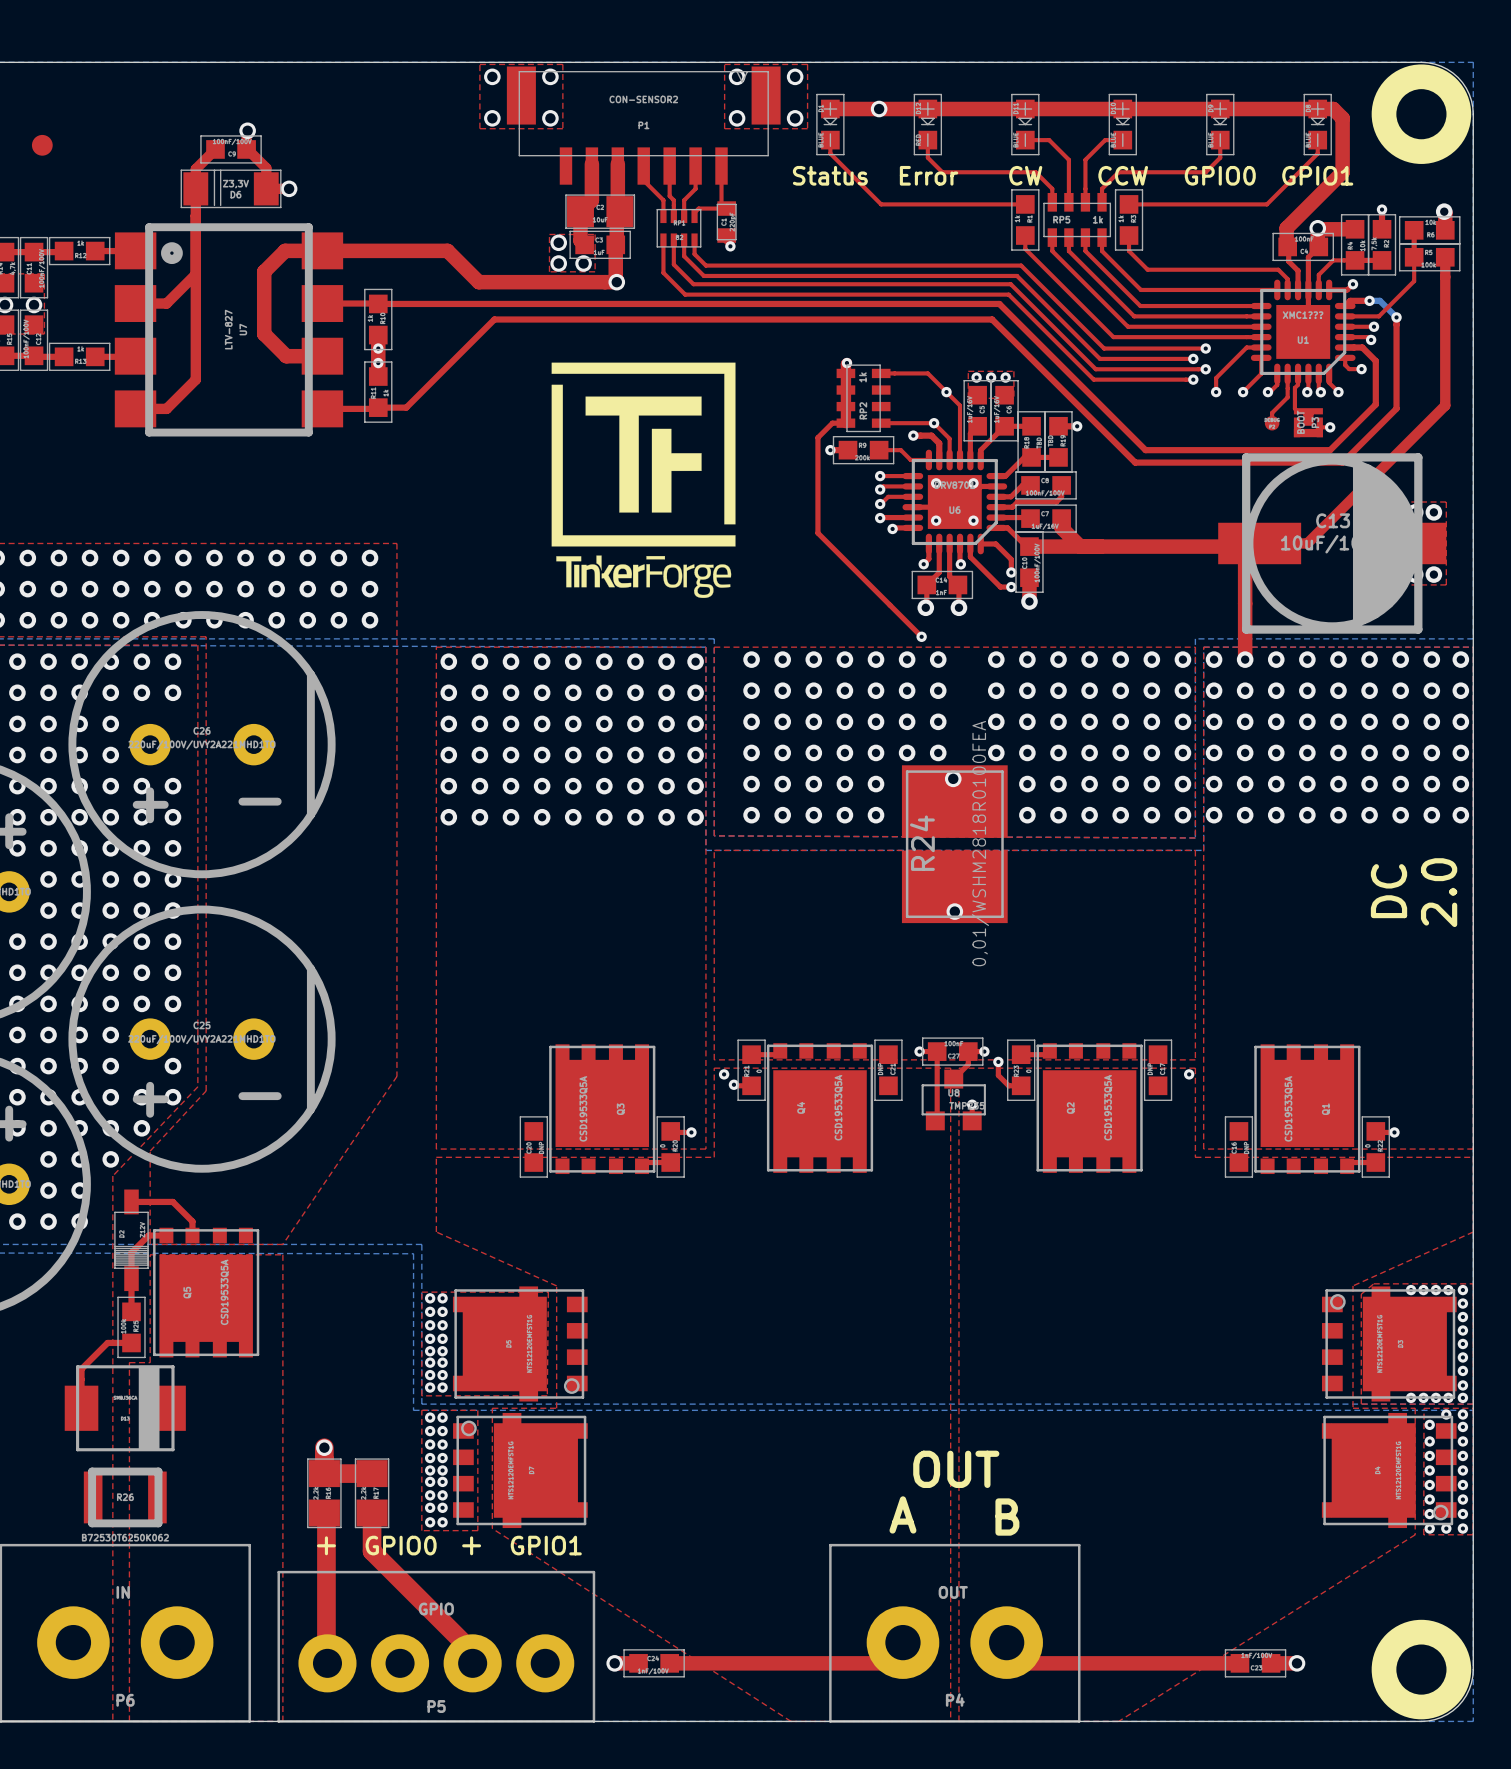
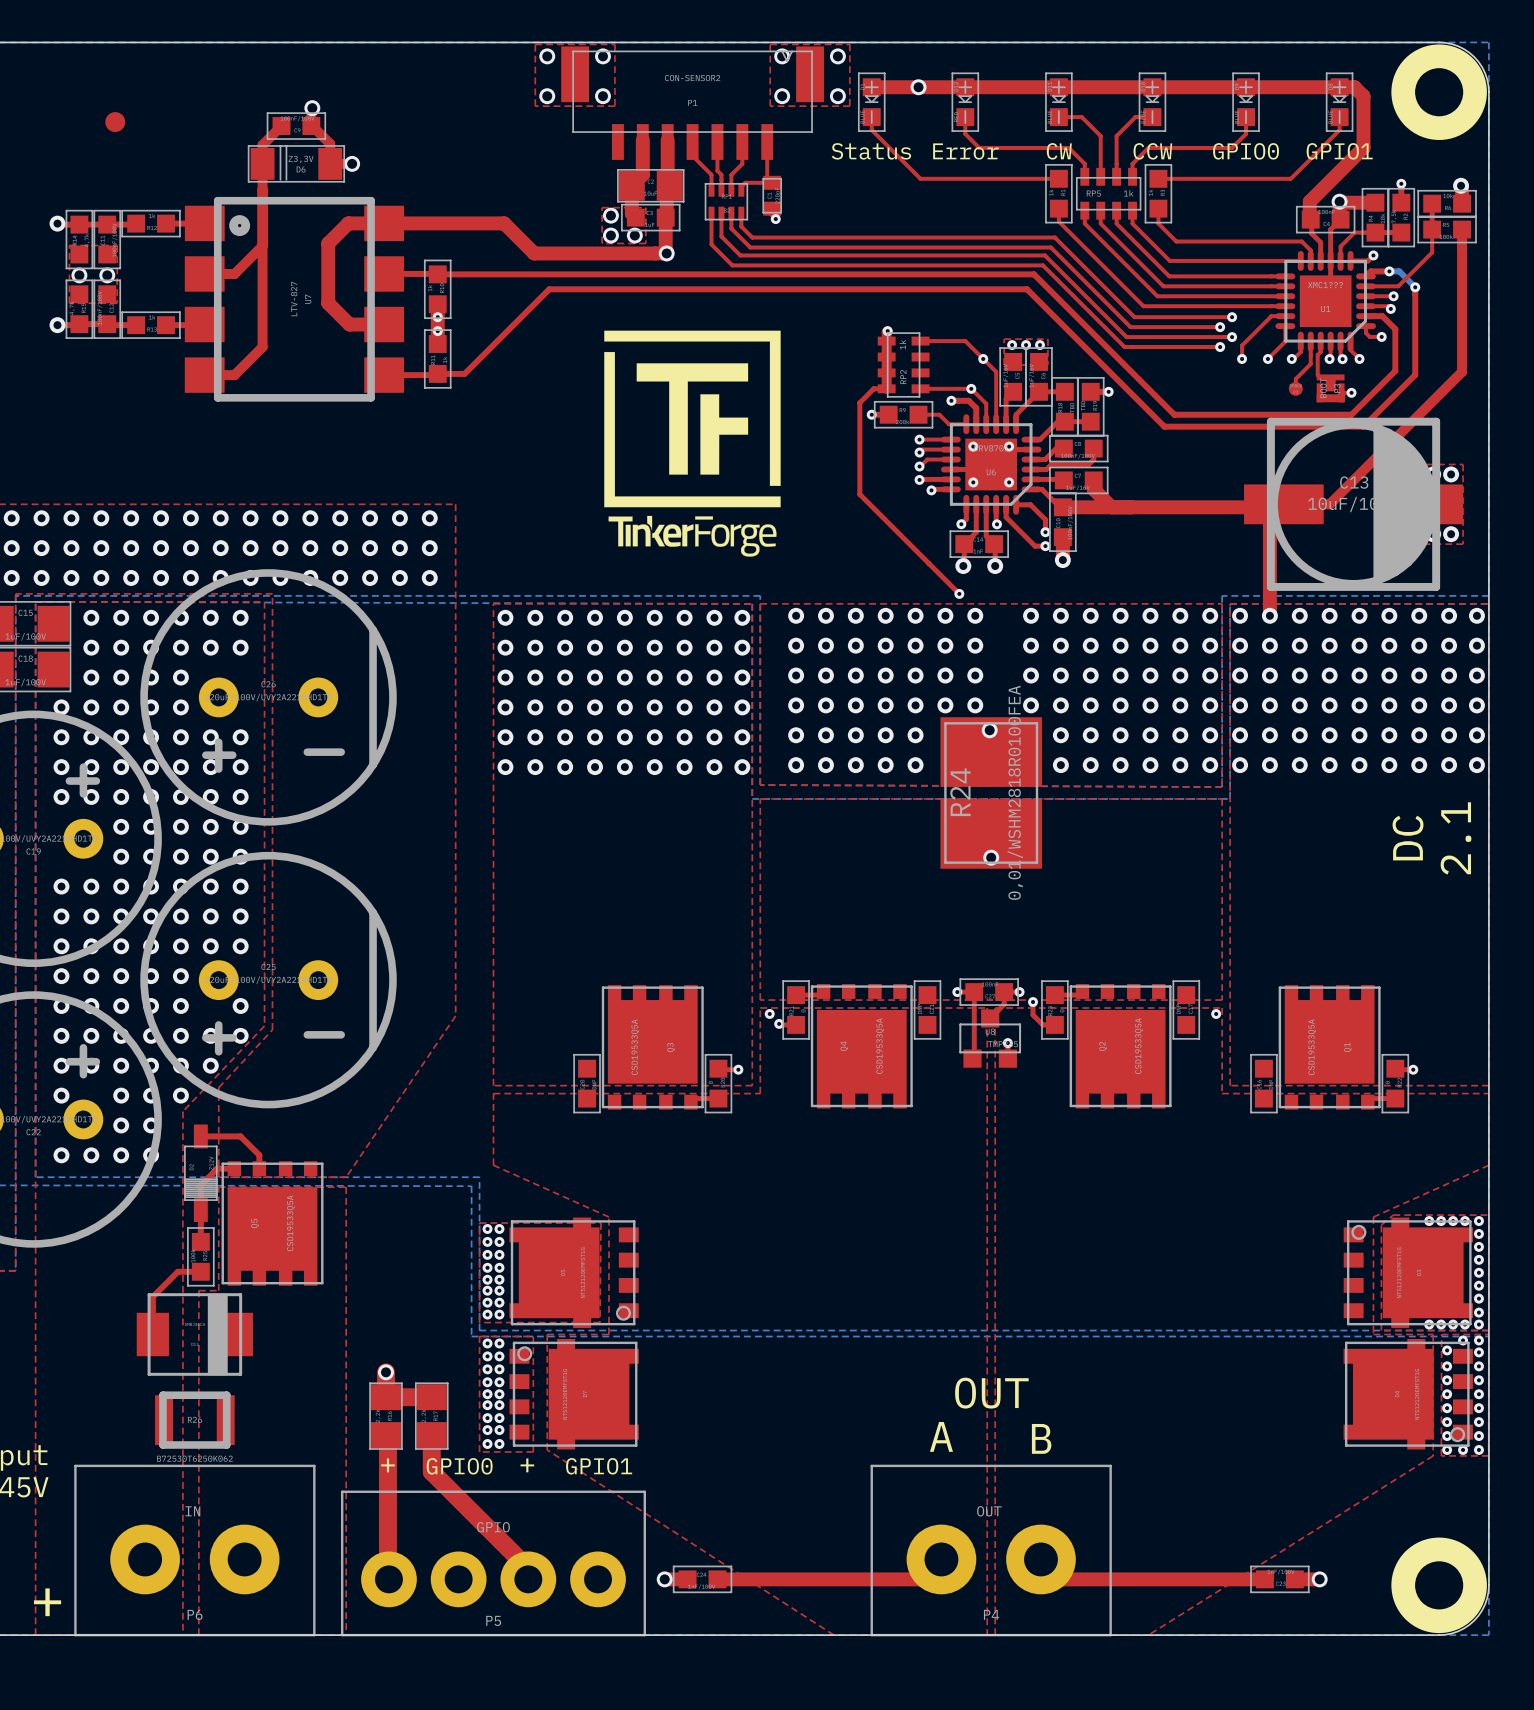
text: 2.0 (1439, 892) -> 2.1 (1456, 838)

